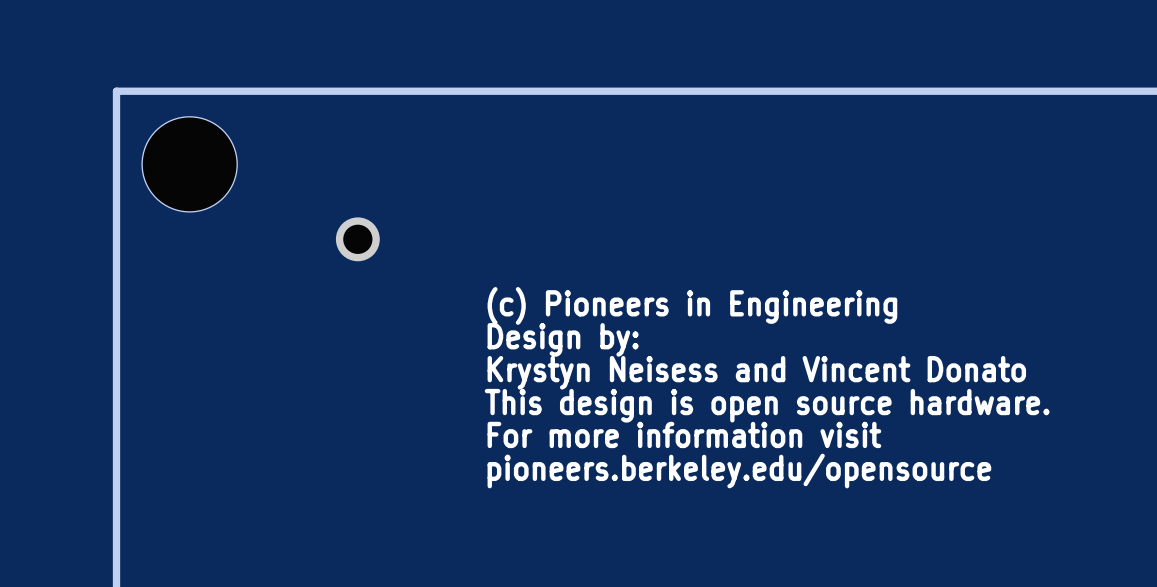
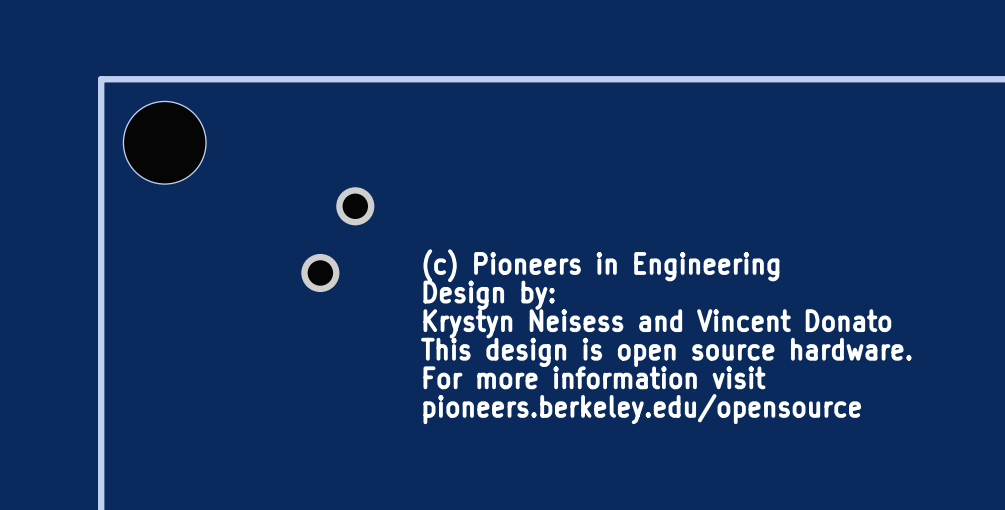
part: none -> (355, 206)
part: (357, 239) -> none
part: none -> (320, 272)

